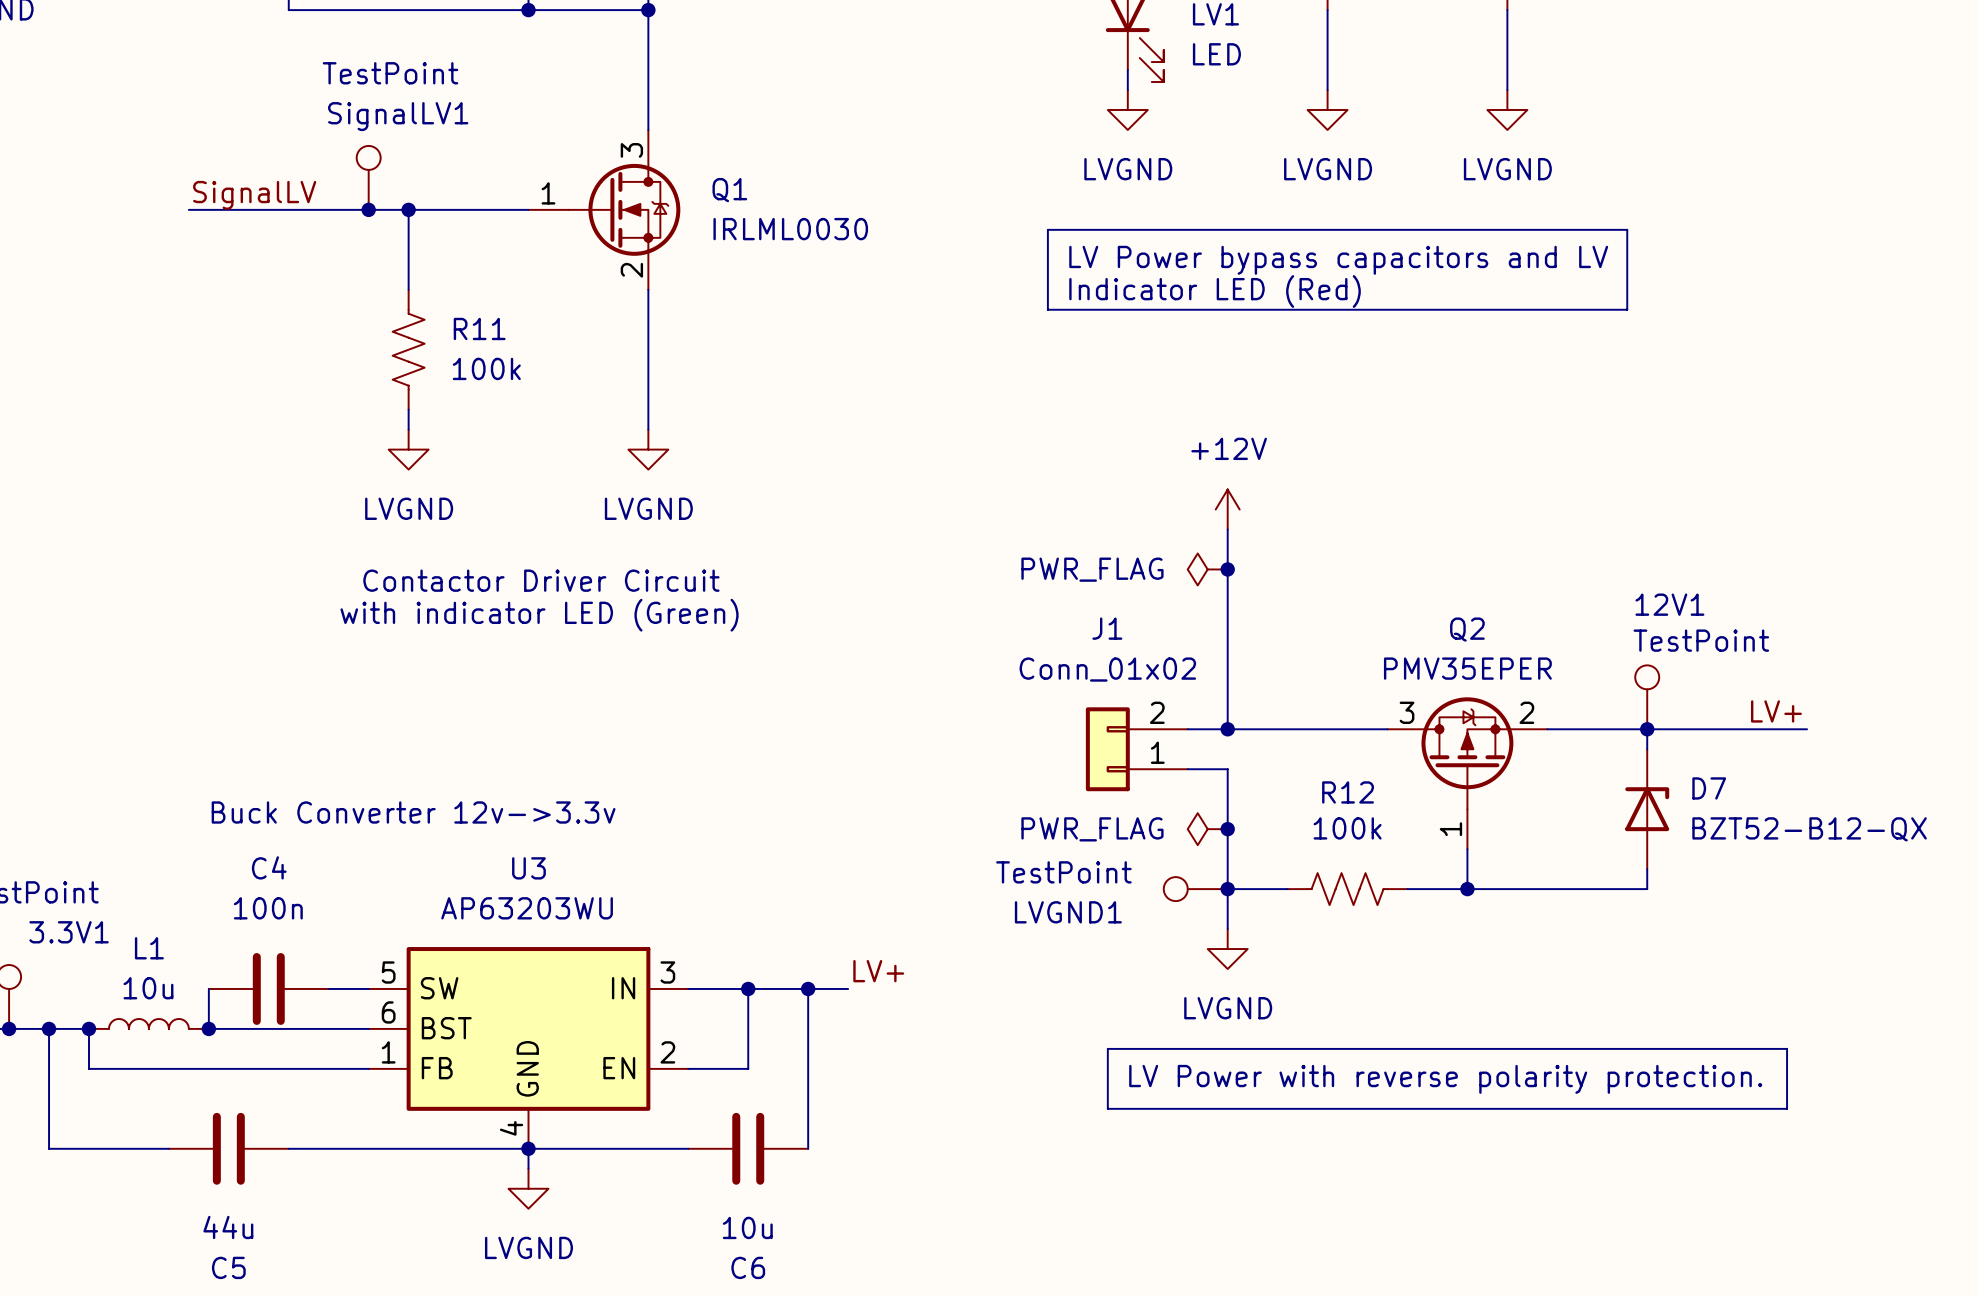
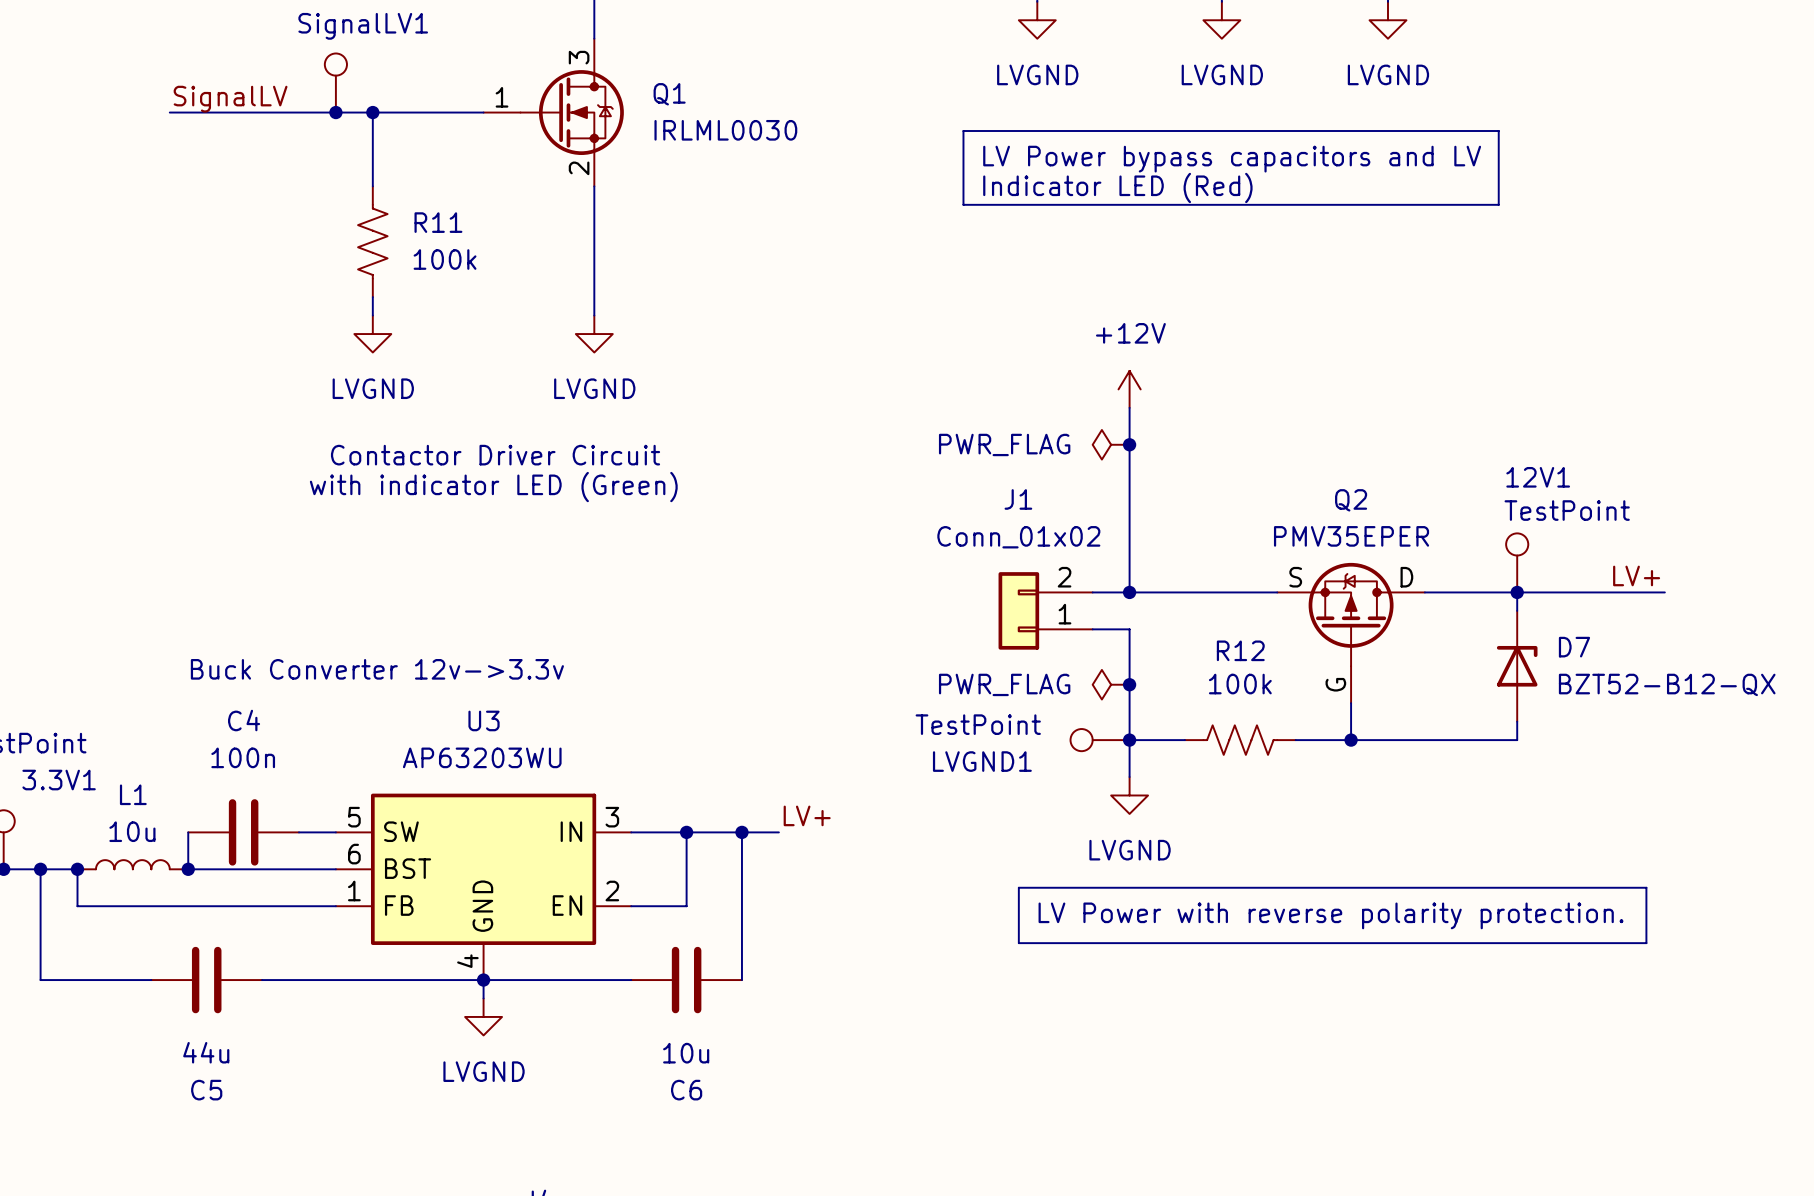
Q2 symbol: [1387, 697, 1548, 850] -> [1277, 562, 1425, 704]

